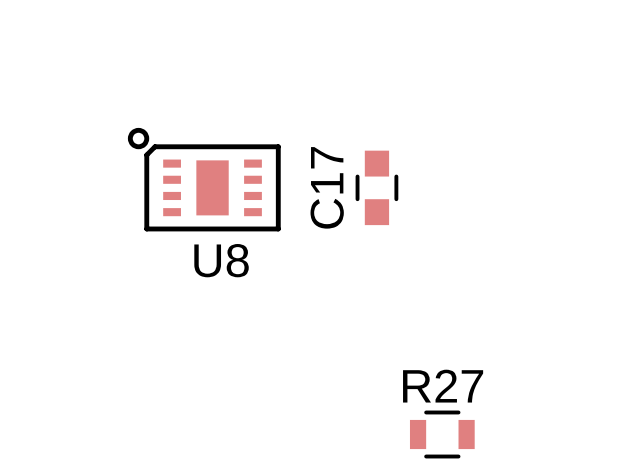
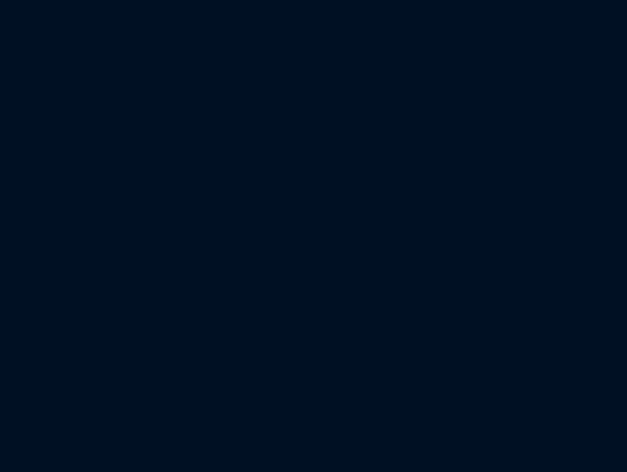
U8: (204, 179) -> none
C17: (376, 187) -> none
R27: (442, 434) -> none

